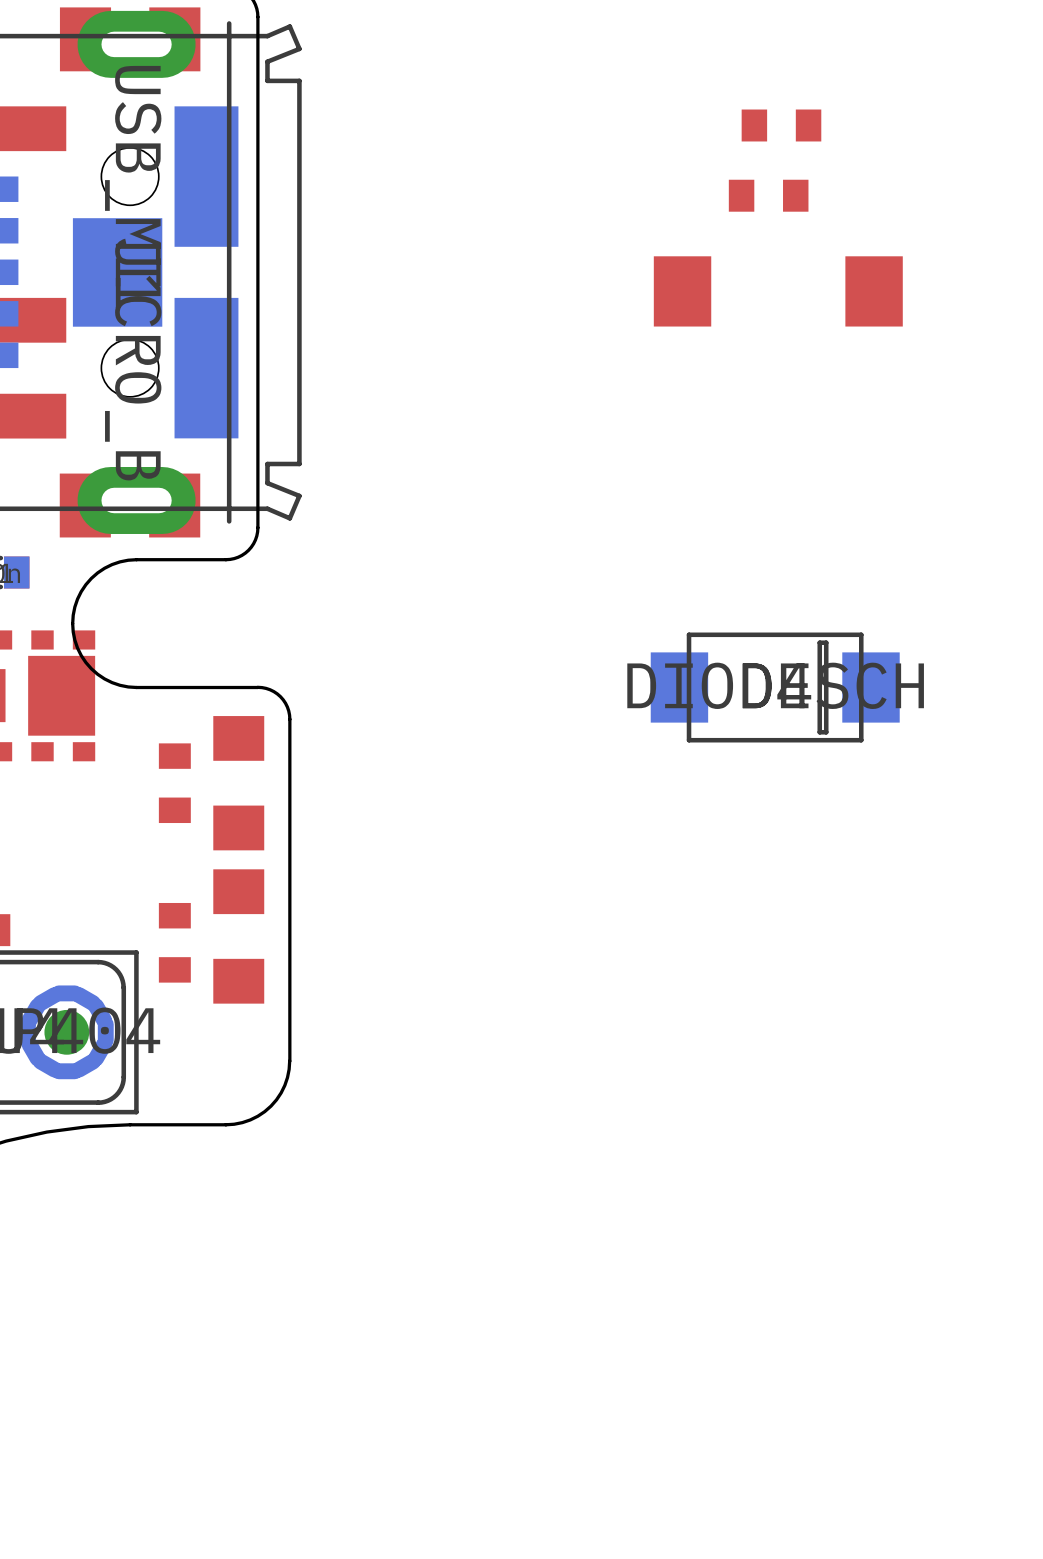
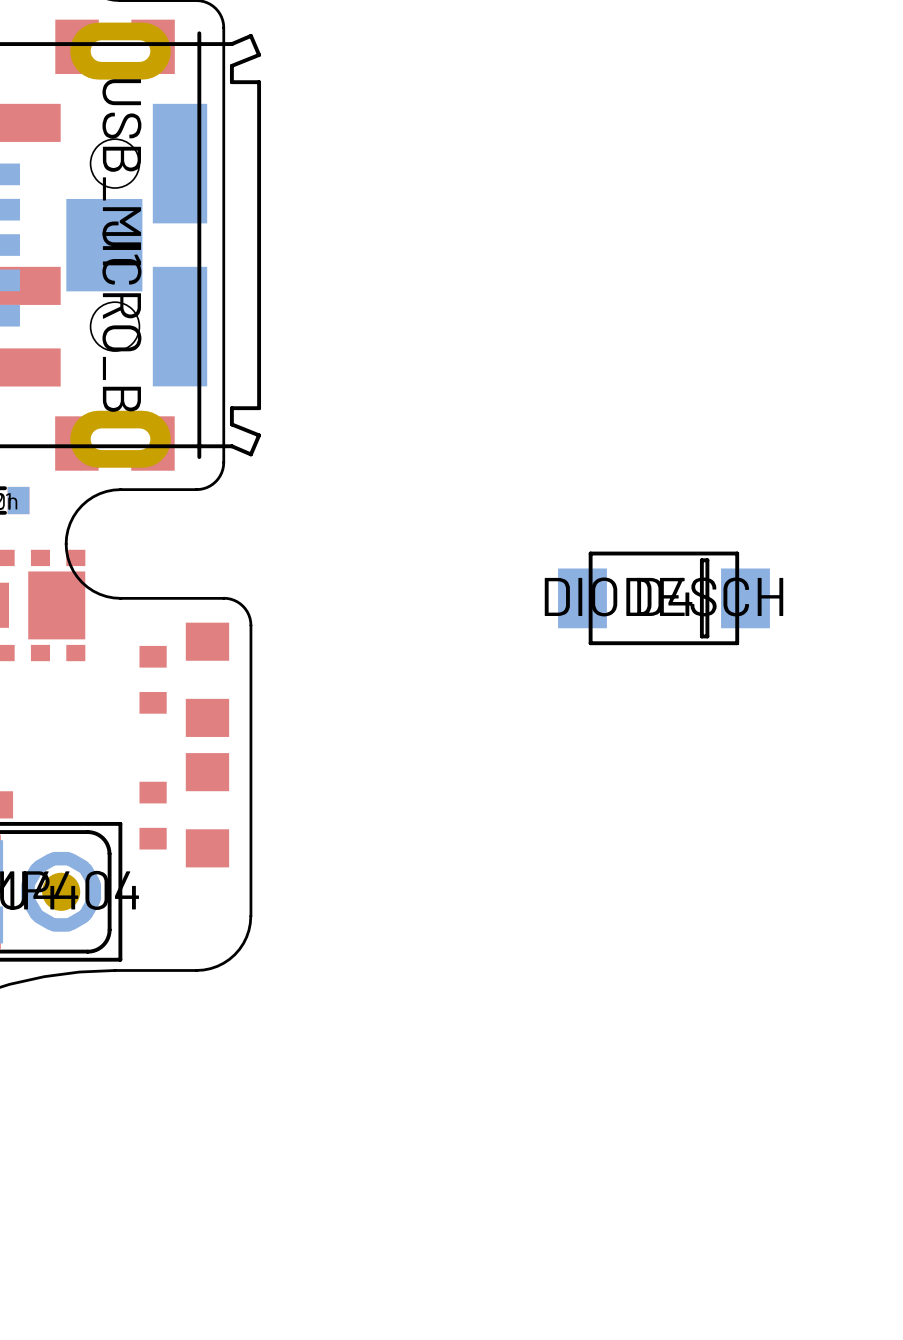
part: (781, 125) -> none
part: (768, 195) -> none
part: (778, 291) -> none

